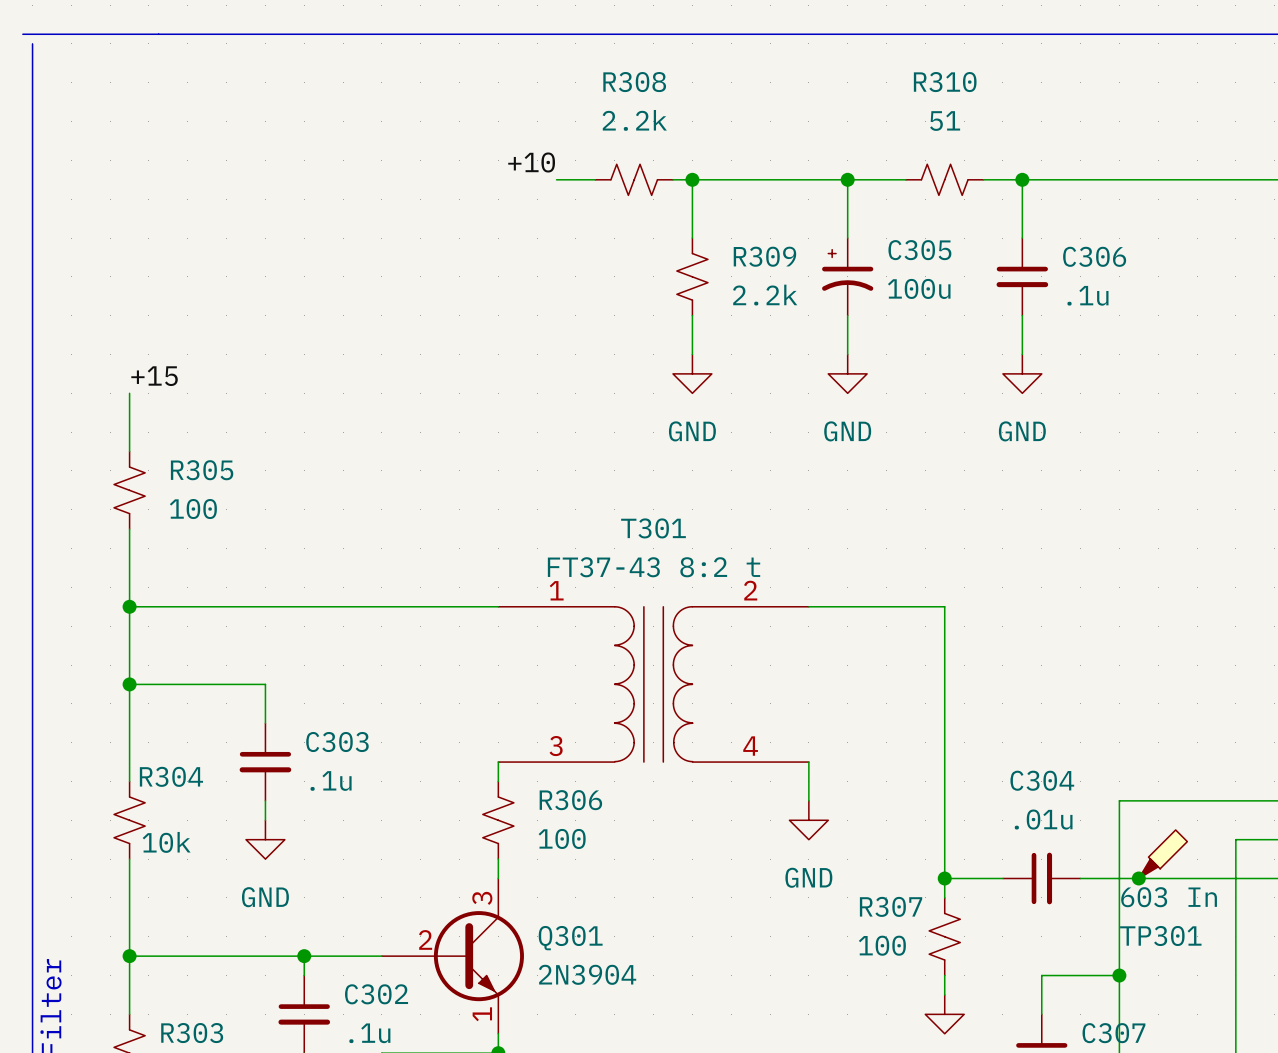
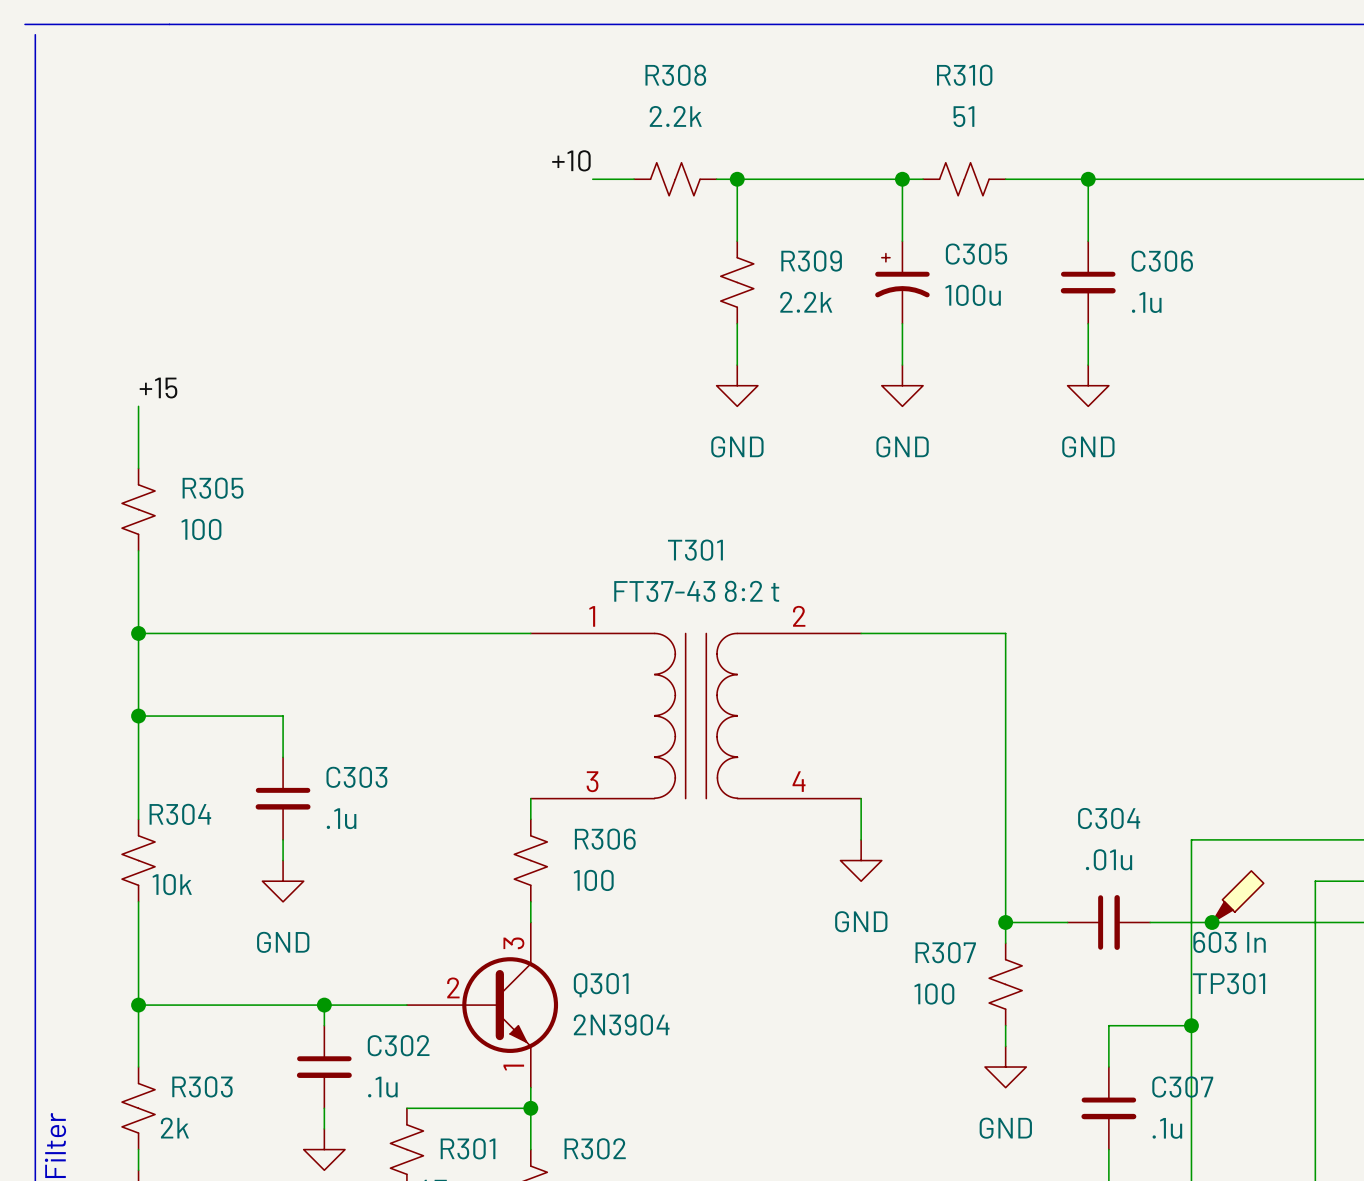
wire: (867, 179) (905, 179) -> (1005, 179) (1046, 179)
R310 position: (944, 179) -> (964, 179)

